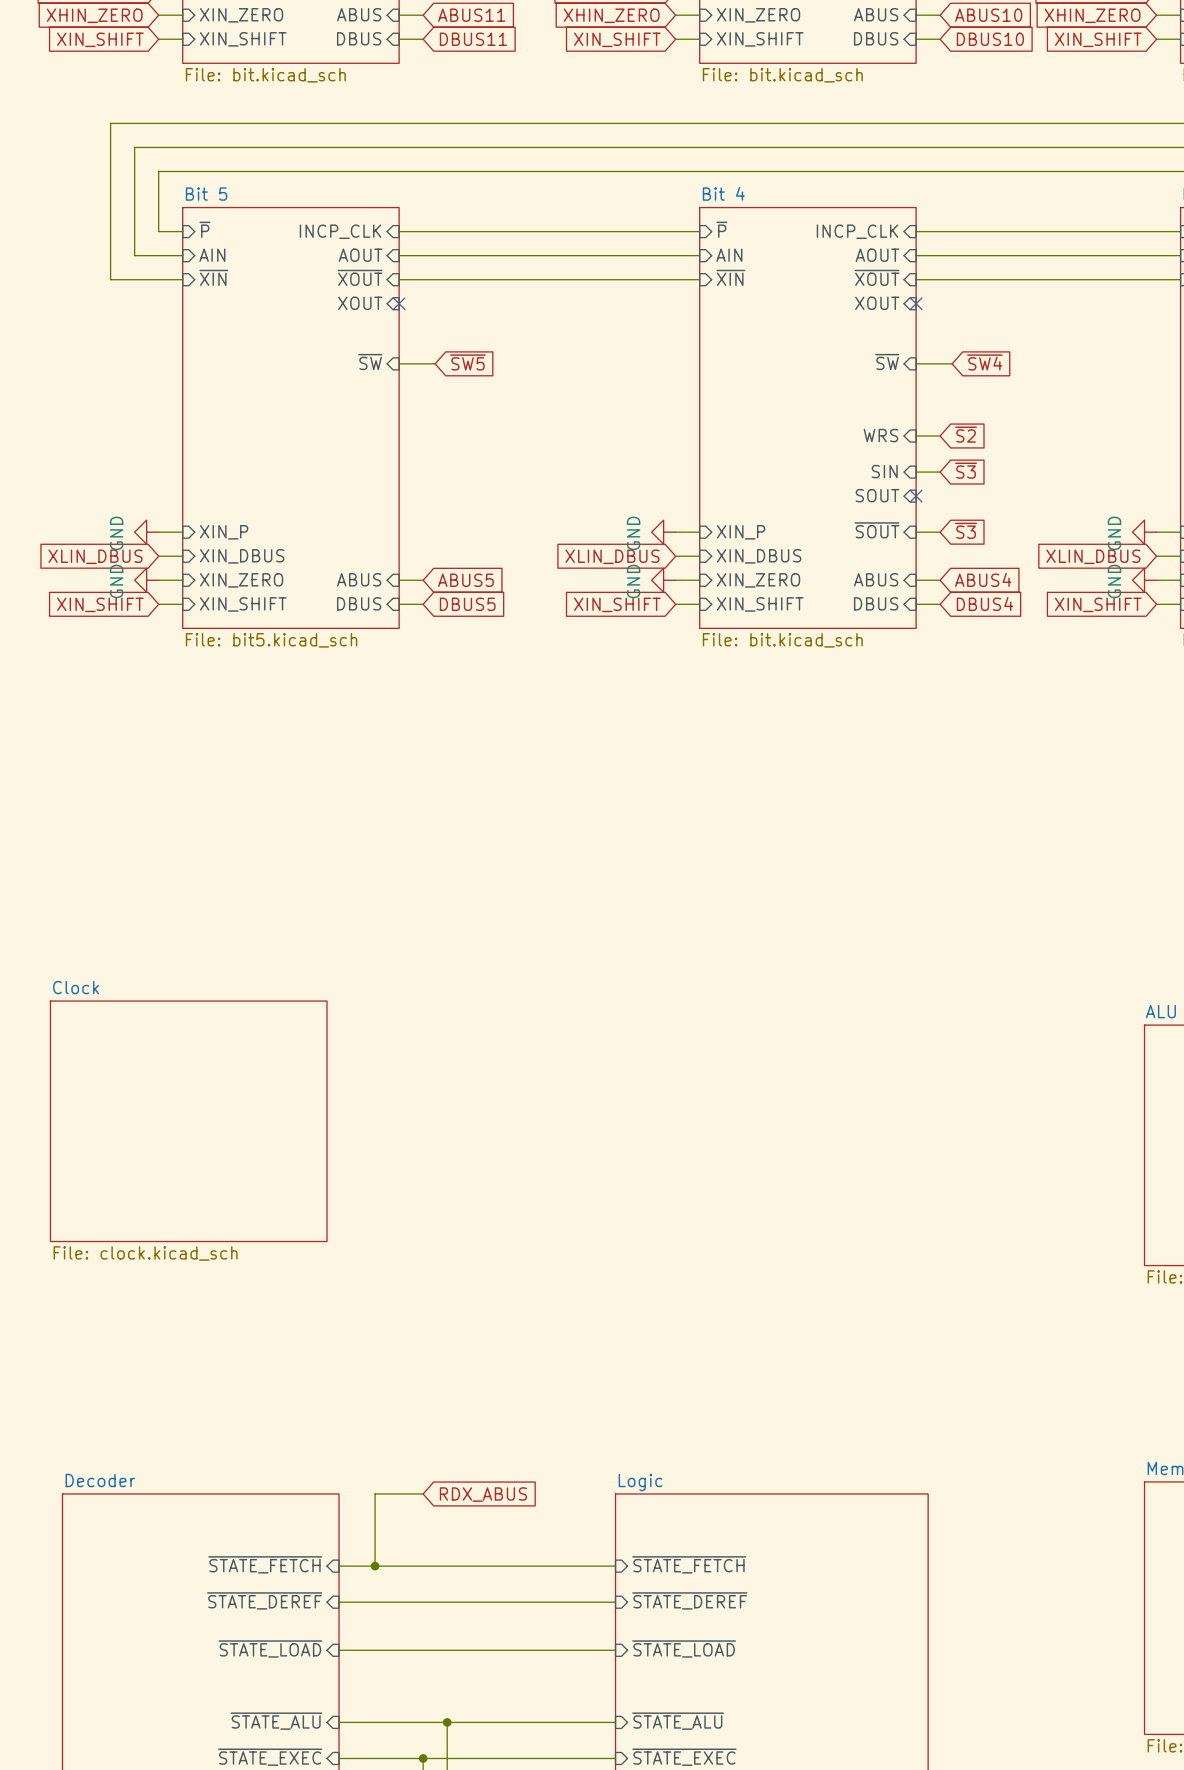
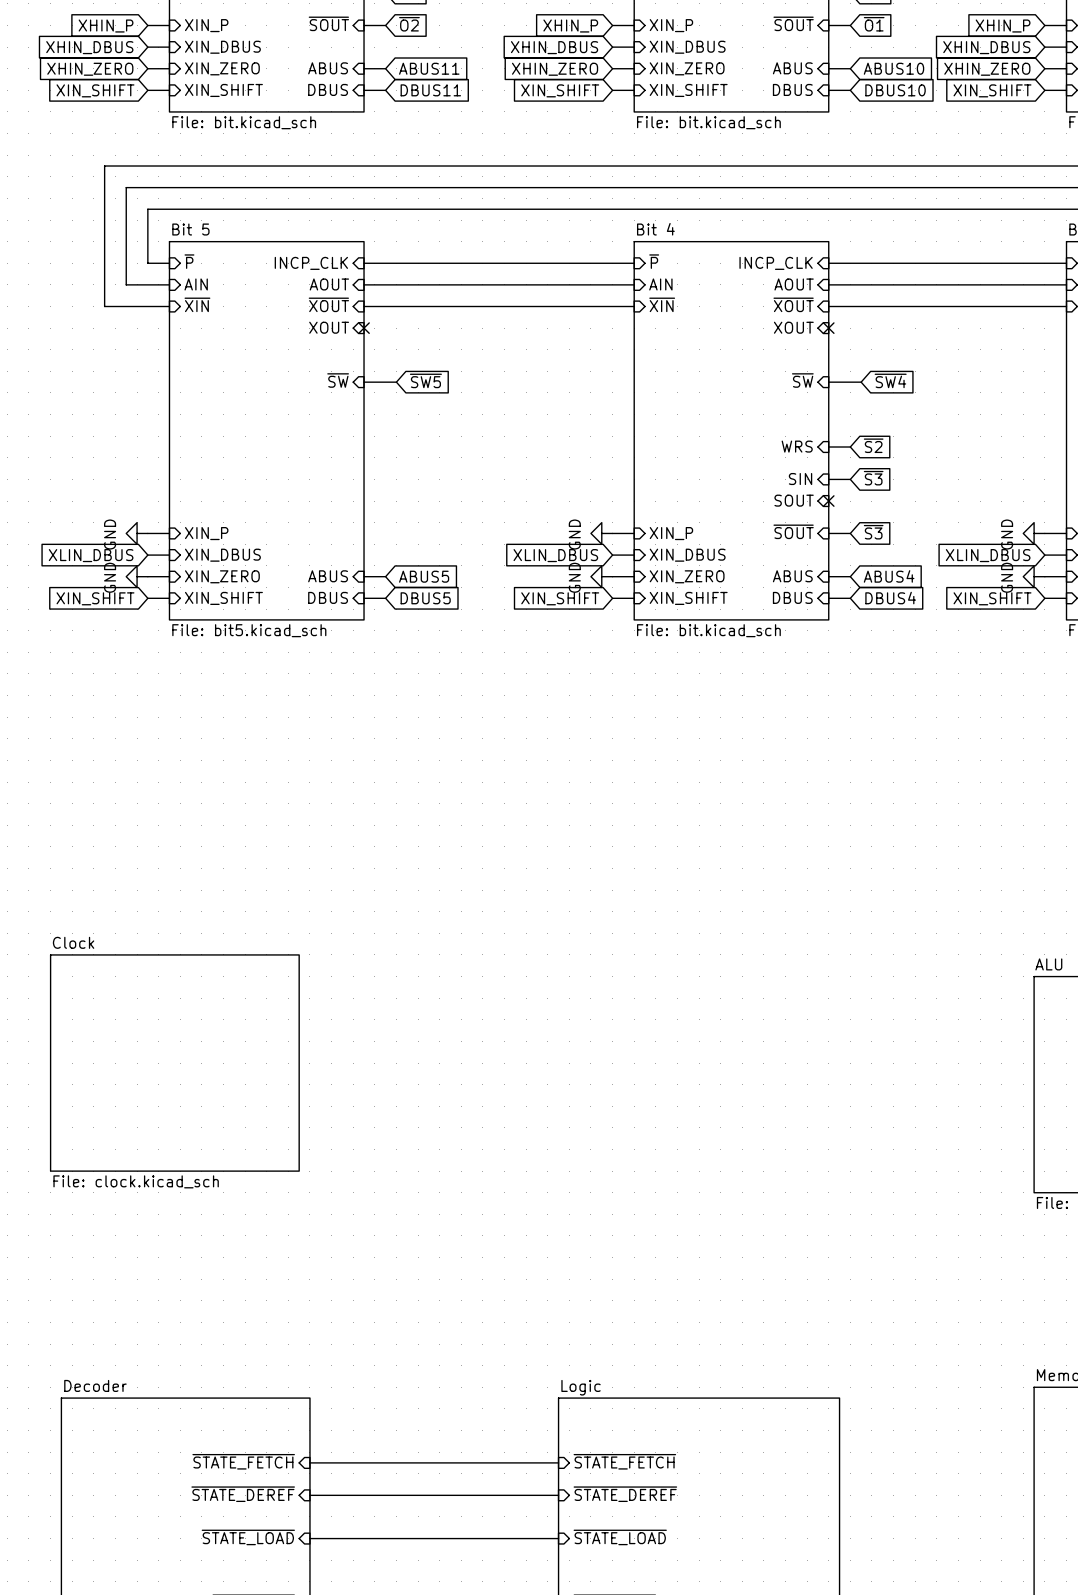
wire: (423, 1493) (375, 1493) (375, 1566) -> none
global label: RDX_ABUS (483, 1494) -> none
junction: (375, 1566) -> none

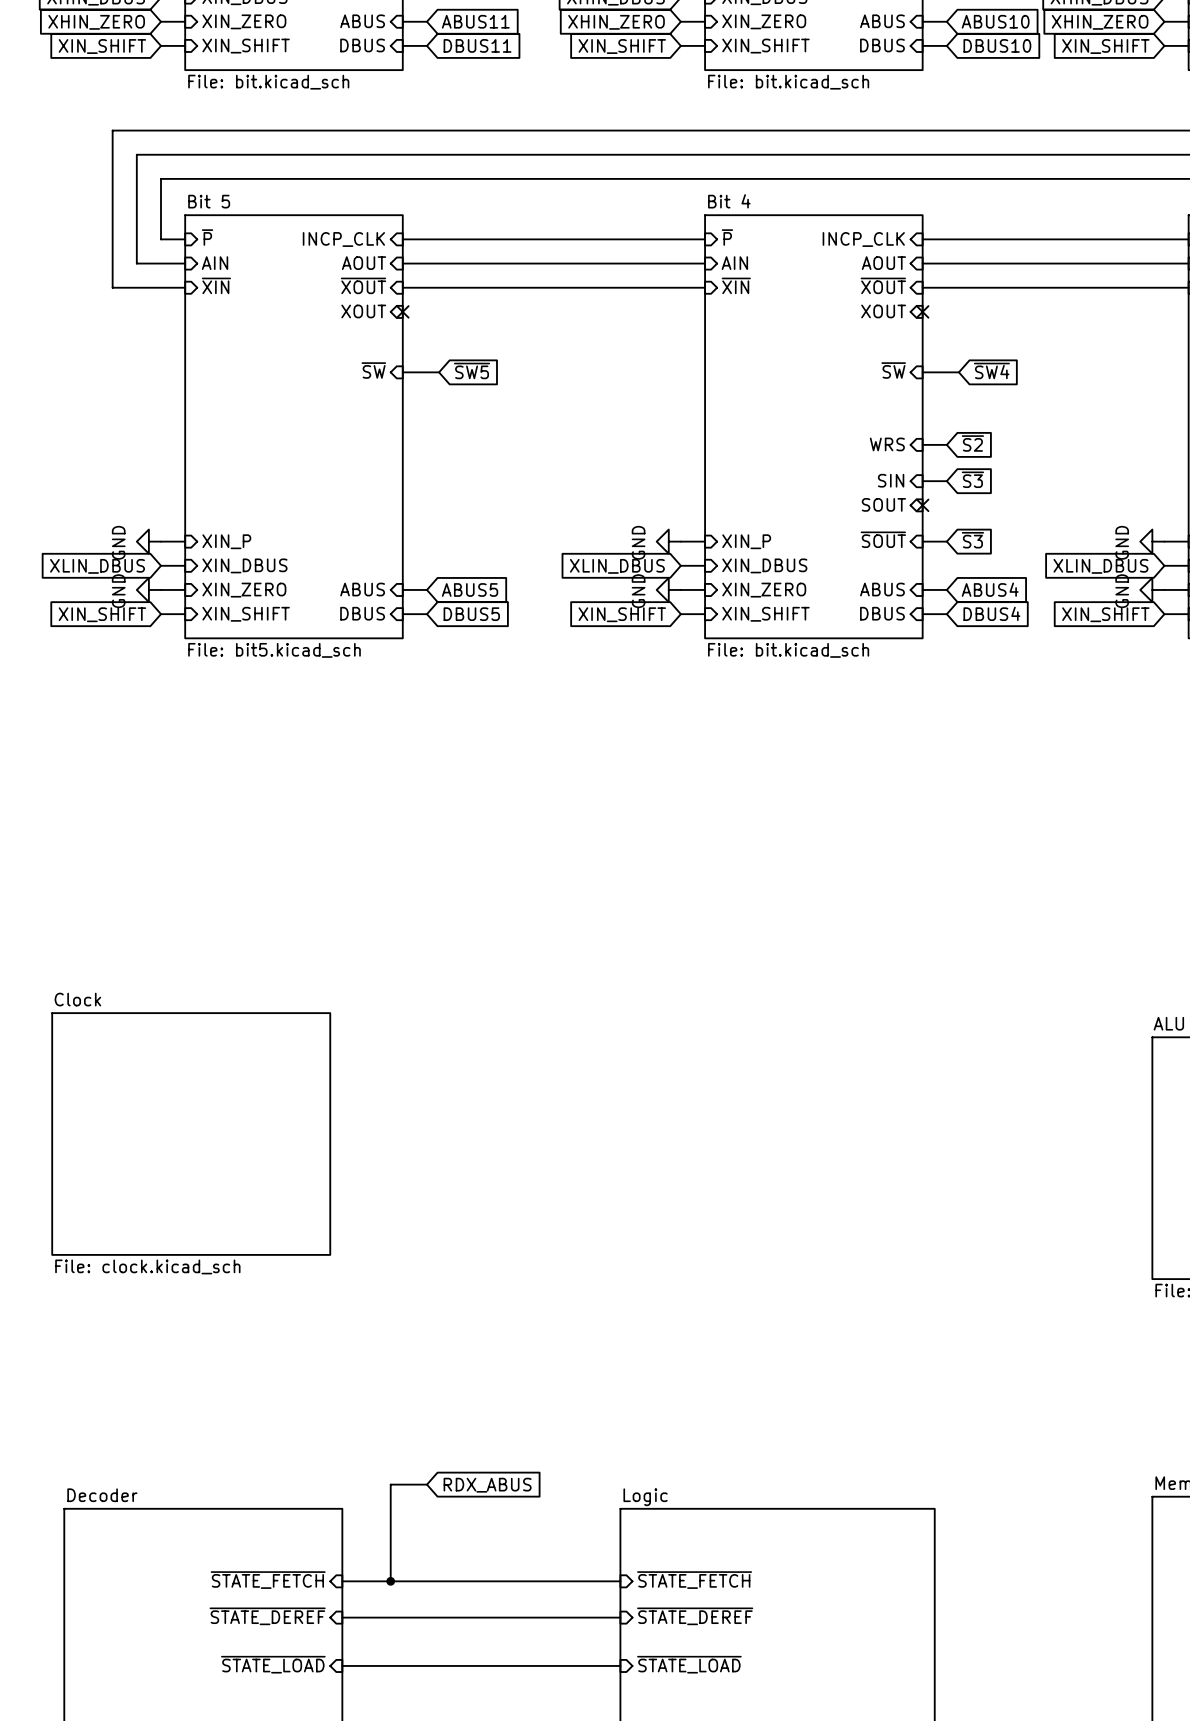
wire: none -> (426, 1484) (390, 1484) (390, 1581)
global label: none -> RDX_ABUS (487, 1485)
junction: none -> (390, 1581)

